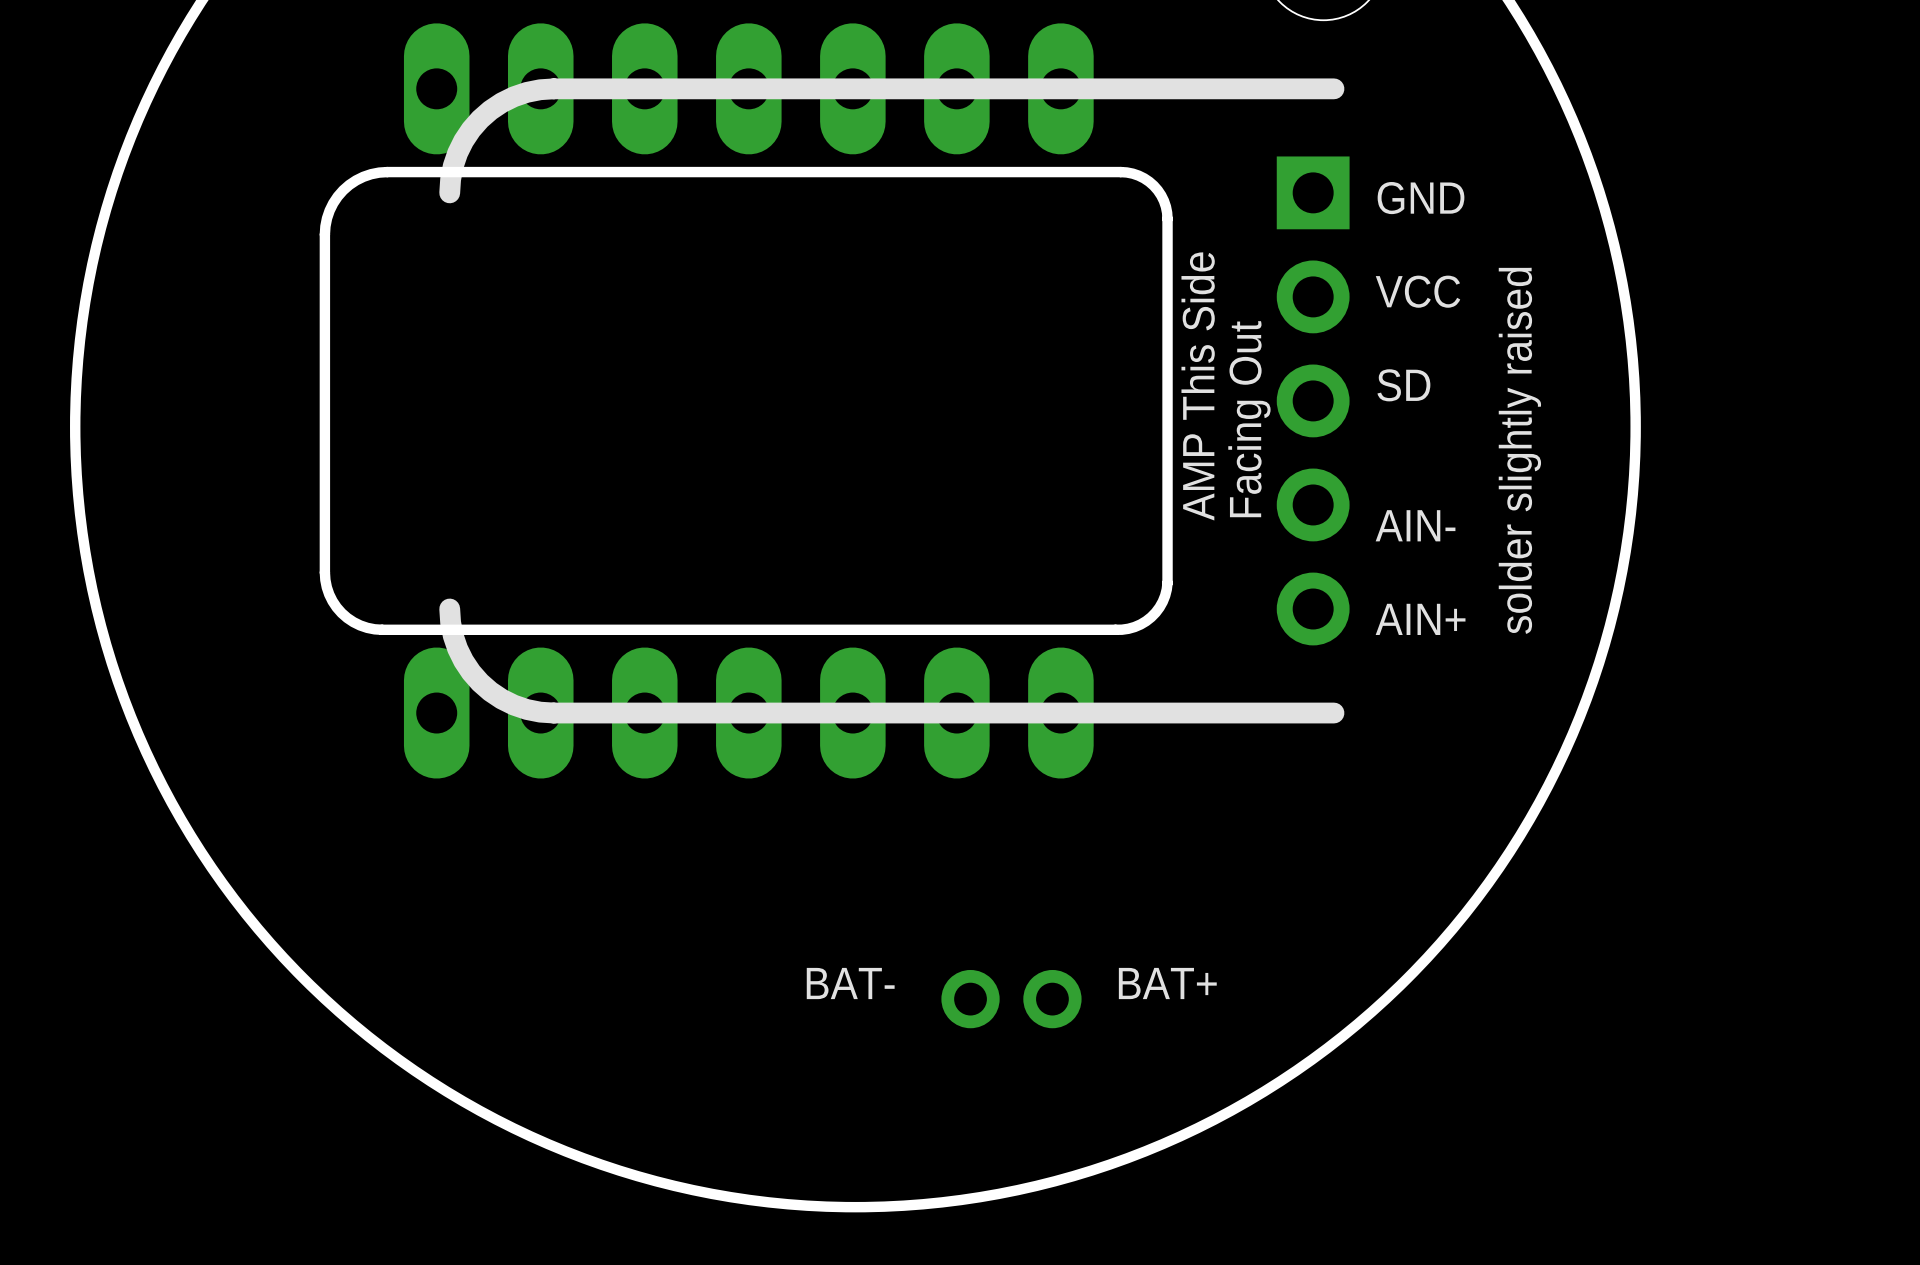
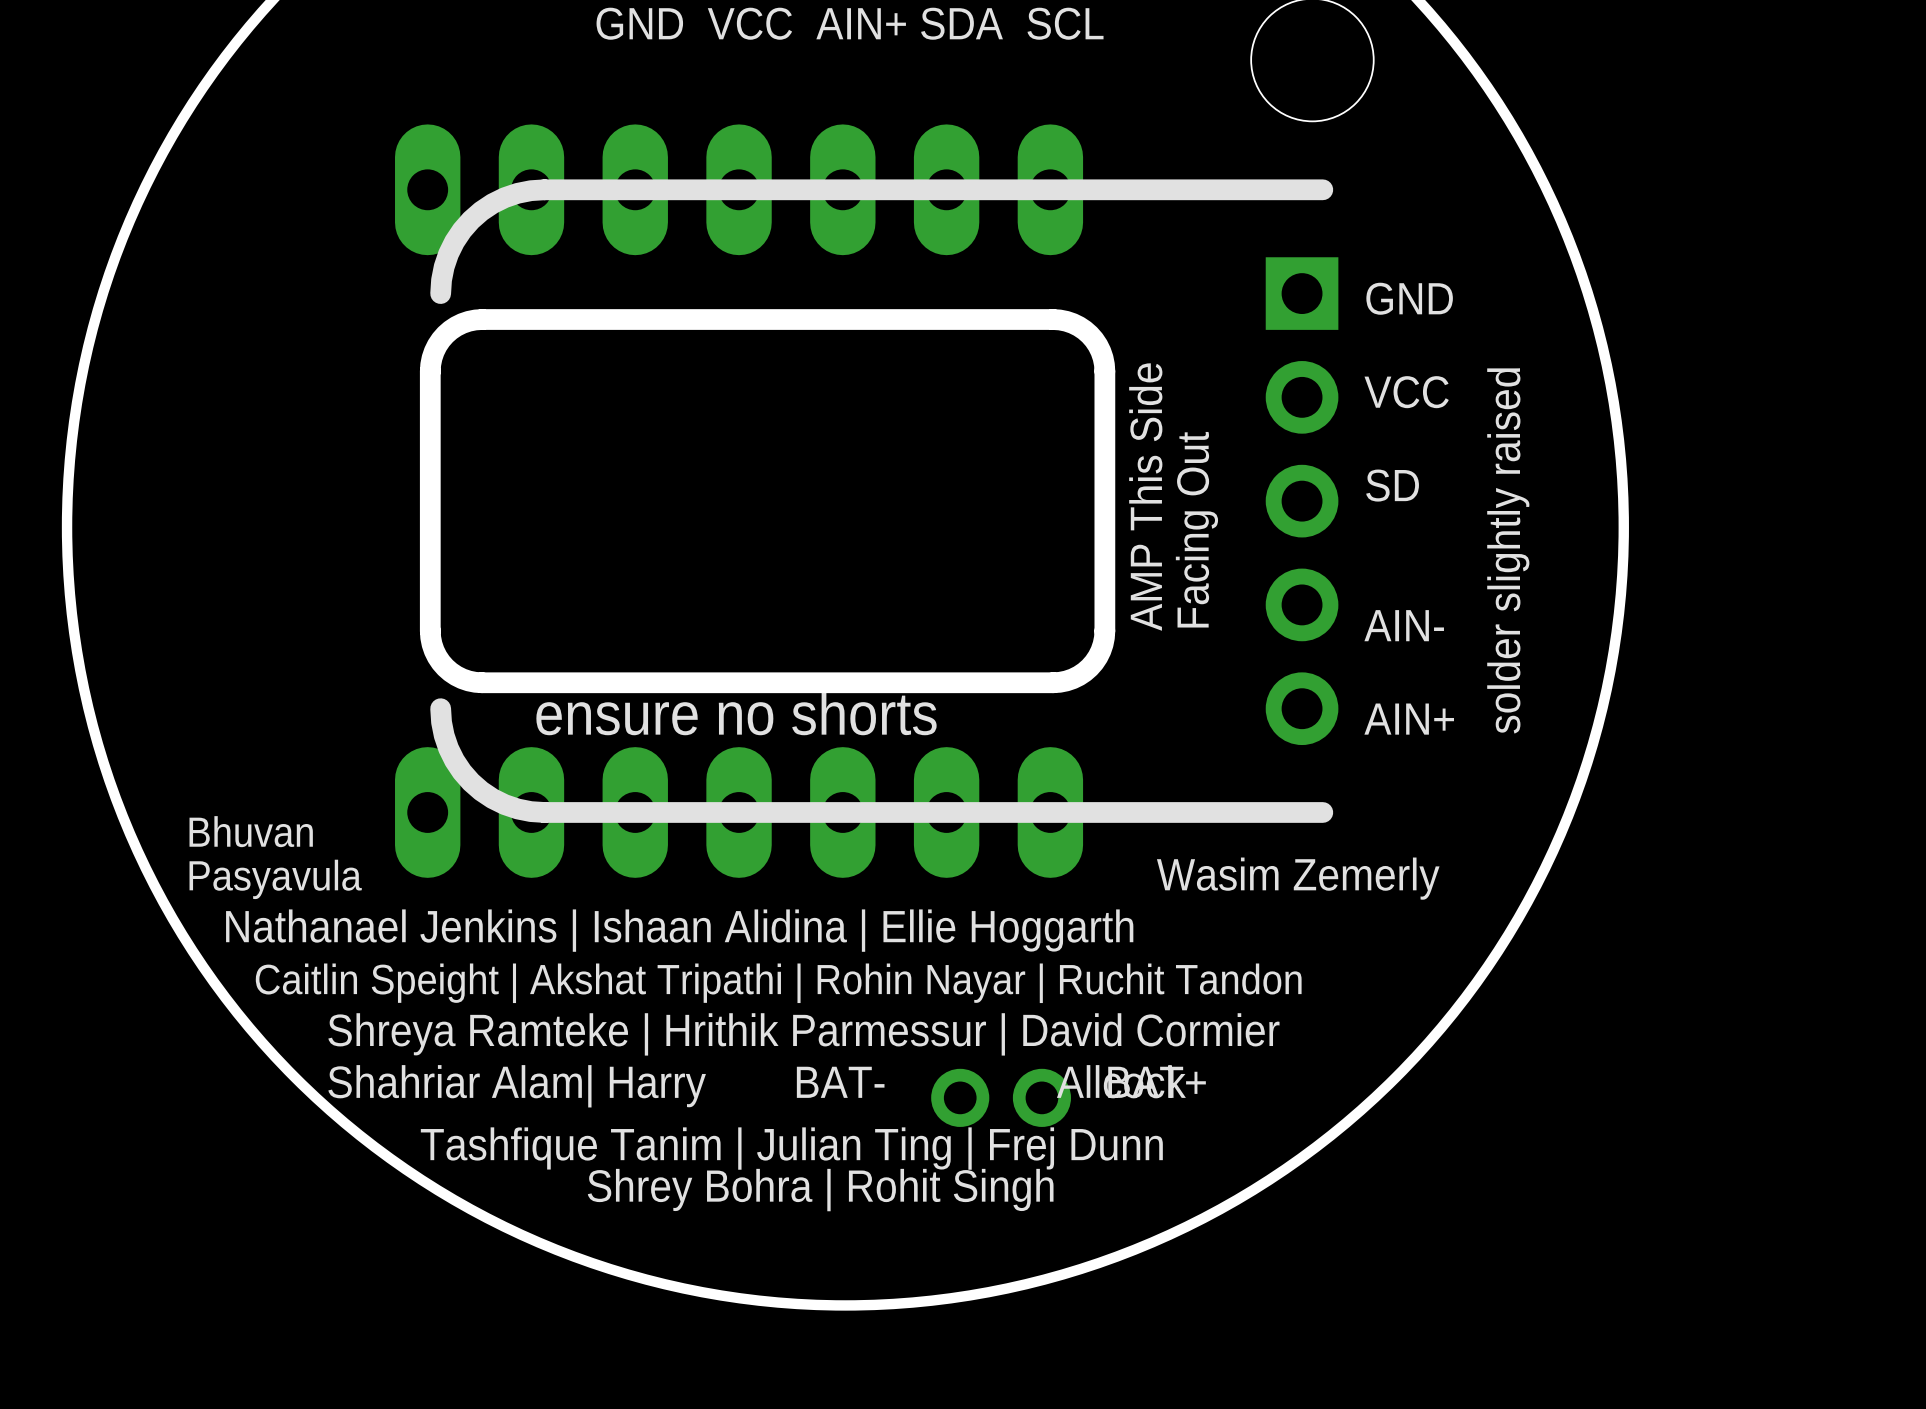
board edge: (1120, 172) (387, 172) (371, 174) (356, 180) (343, 190) (333, 203) (327, 218) (324, 234) (324, 572) (326, 587) (332, 601) (341, 613) (353, 622) (367, 627) (382, 629) (1115, 629) (1128, 628) (1140, 624) (1151, 617) (1159, 607) (1165, 595) (1167, 582) (1167, 218) (1163, 200) (1153, 185) (1138, 175) (1120, 172) -> (1052, 319) (1066, 321) (1084, 330) (1097, 345) (1104, 364) (1104, 637) (1097, 656) (1089, 667) (1078, 675) (1066, 680) (1052, 682) (482, 682) (468, 680) (456, 675) (445, 667) (437, 656) (432, 644) (430, 630) (430, 371) (432, 357) (437, 345) (445, 334) (456, 326) (468, 321) (482, 319) (1052, 319)
text position: AMP This Side (1198, 386) -> AMP This Side (1145, 497)
text position: Facing Out (1249, 419) -> Facing Out (1196, 529)
text: none -> ensure no shorts (736, 713)
text: none -> Bhuvan (251, 831)
text: none -> Wasim Zemerly (1298, 878)
text: none -> Pasyavula (275, 879)
text: none -> Nathanael Jenkins | Ishaan Alidina | Ellie Hoggarth (679, 930)
text: none -> Caitlin Speight | Akshat Tripathi | Rohin Nayar | Ruchit Tandon (778, 983)
text: none -> Shreya Ramteke | Hrithik Parmessur | David Cormier (803, 1034)
text: none -> Shahriar Alam| Harry Allcock (757, 1086)
text: none -> Tashfique Tanim | Julian Ting | Frej Dunn (791, 1148)
text: none -> Shrey Bohra | Rohit Singh (820, 1190)

